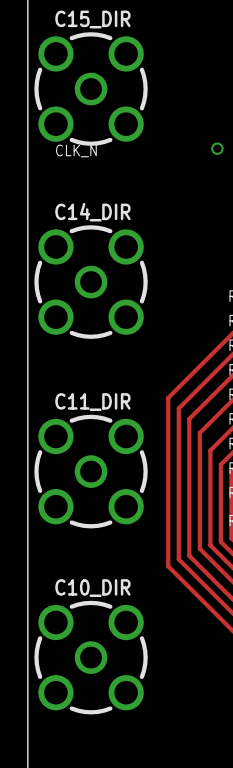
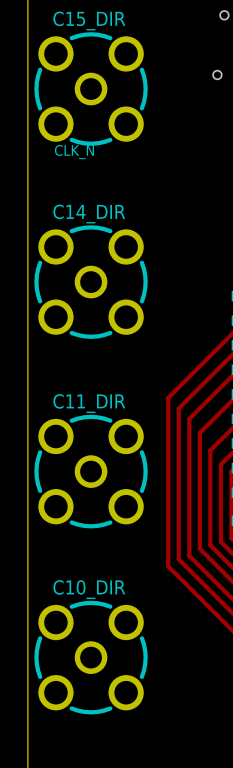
via: none -> (224, 15)
via: none -> (217, 74)
via: (217, 148) -> none

